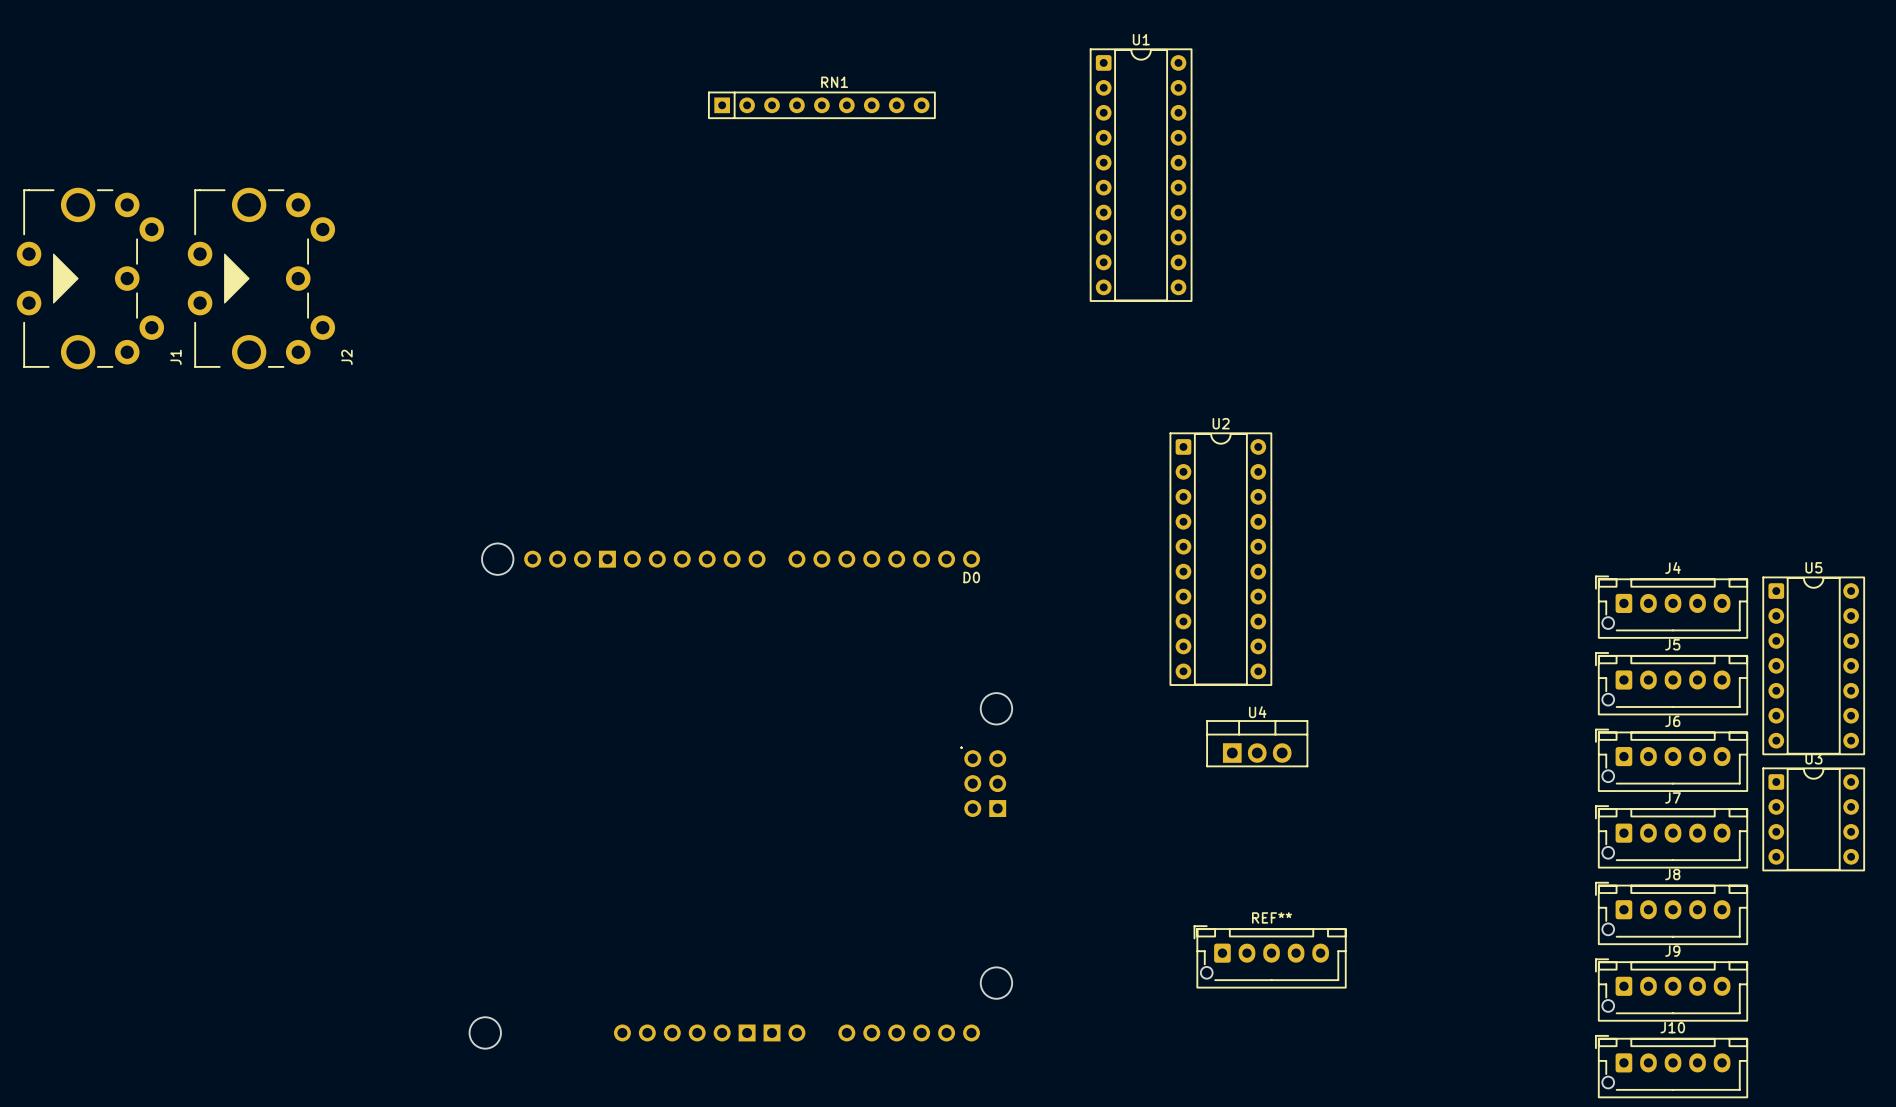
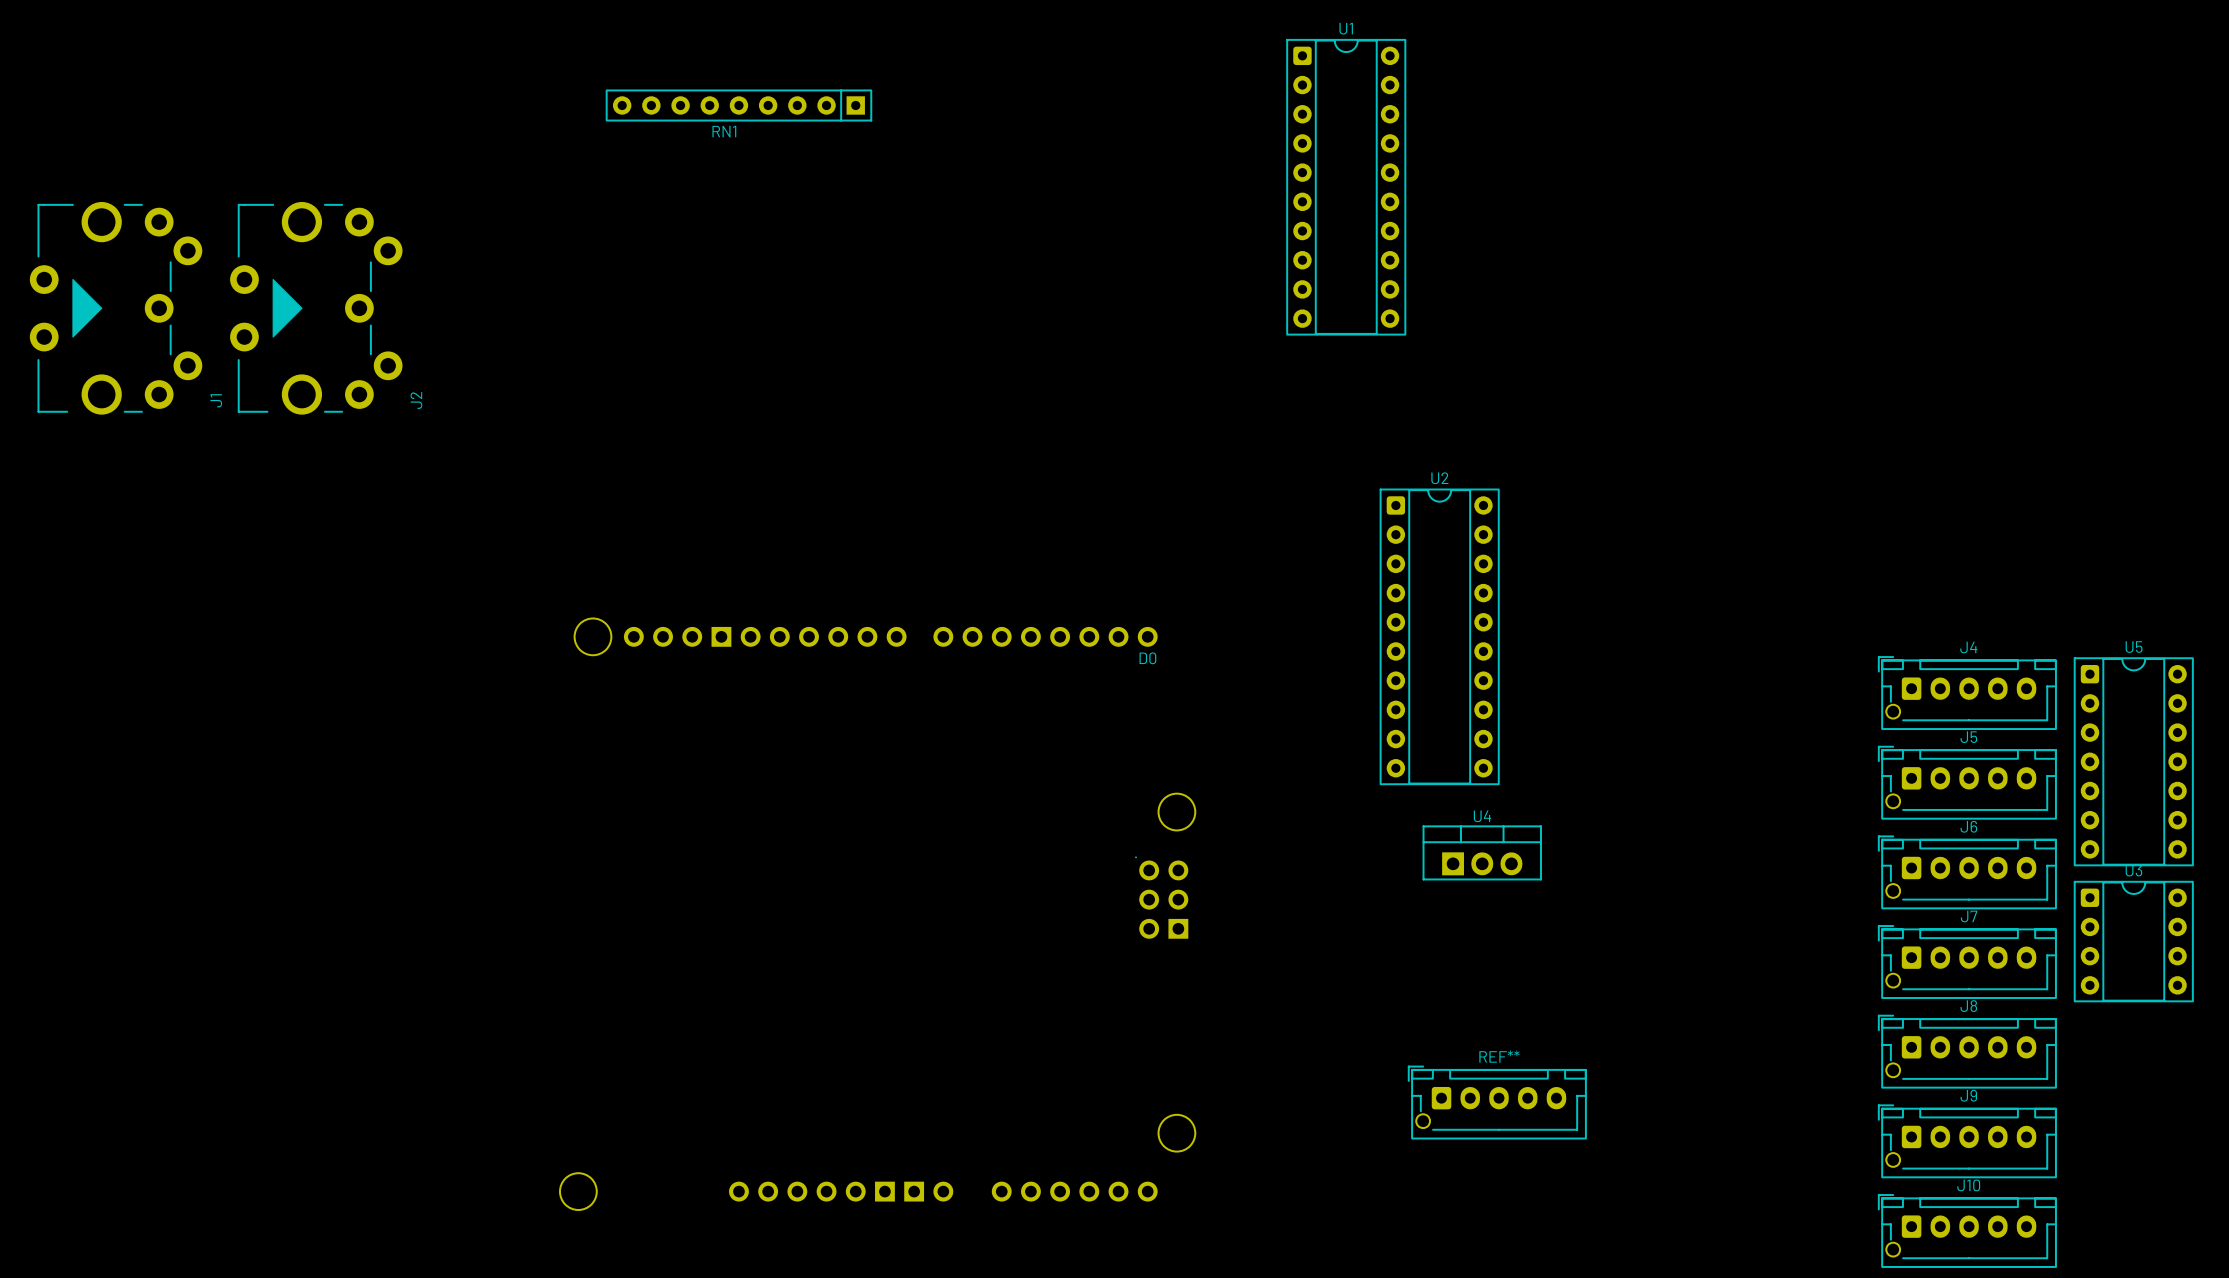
RN1 rotation: 0° (821, 105) -> 180° (738, 105)
RN1 position: (821, 105) -> (738, 105)

